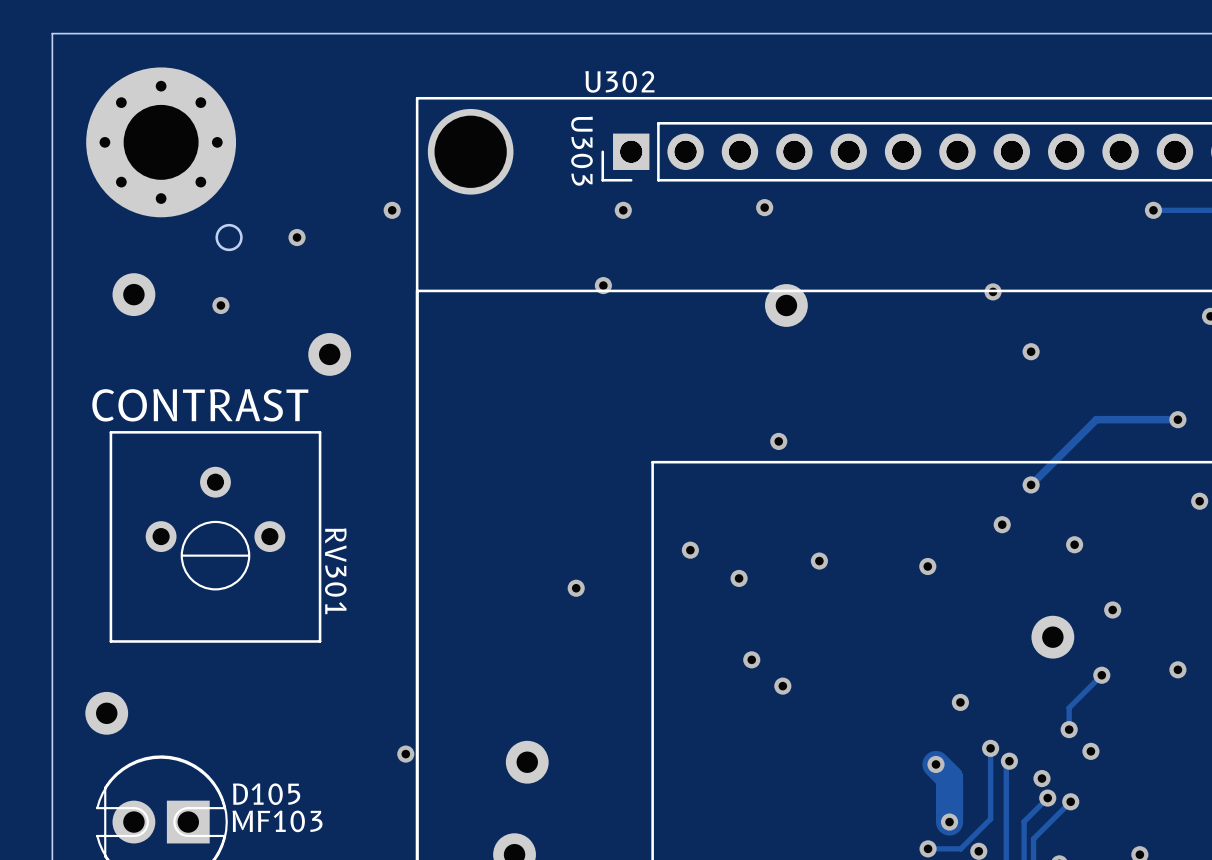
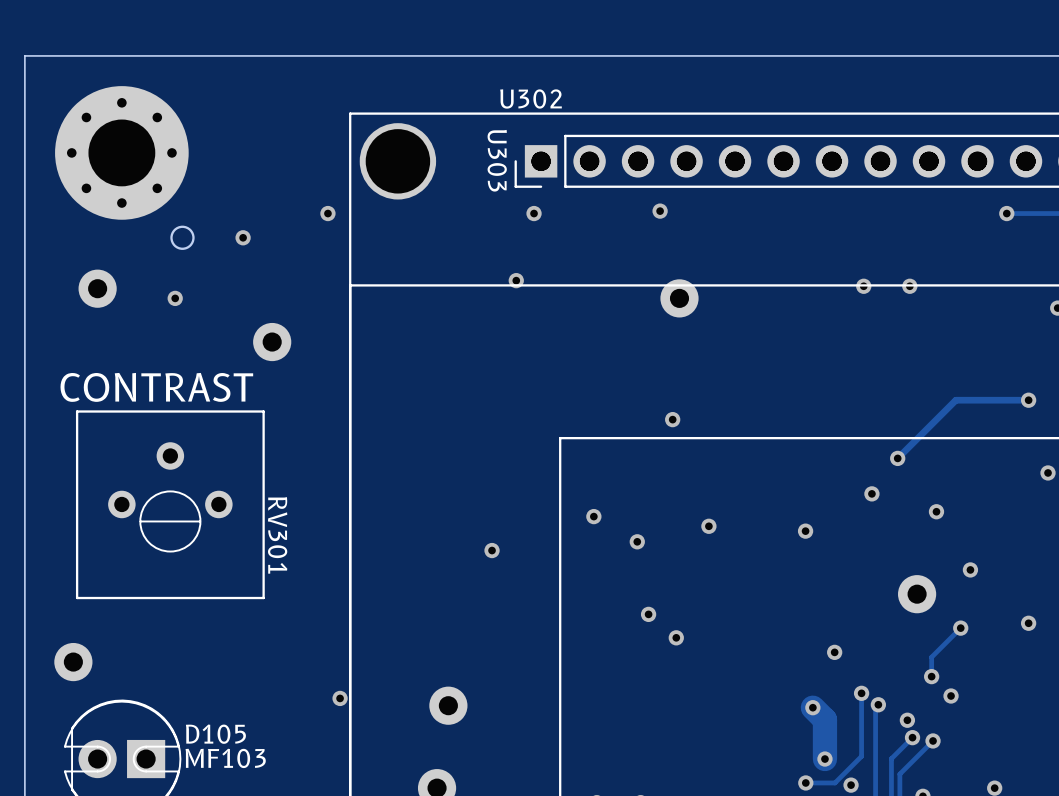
via position: (1031, 351) -> (909, 286)

